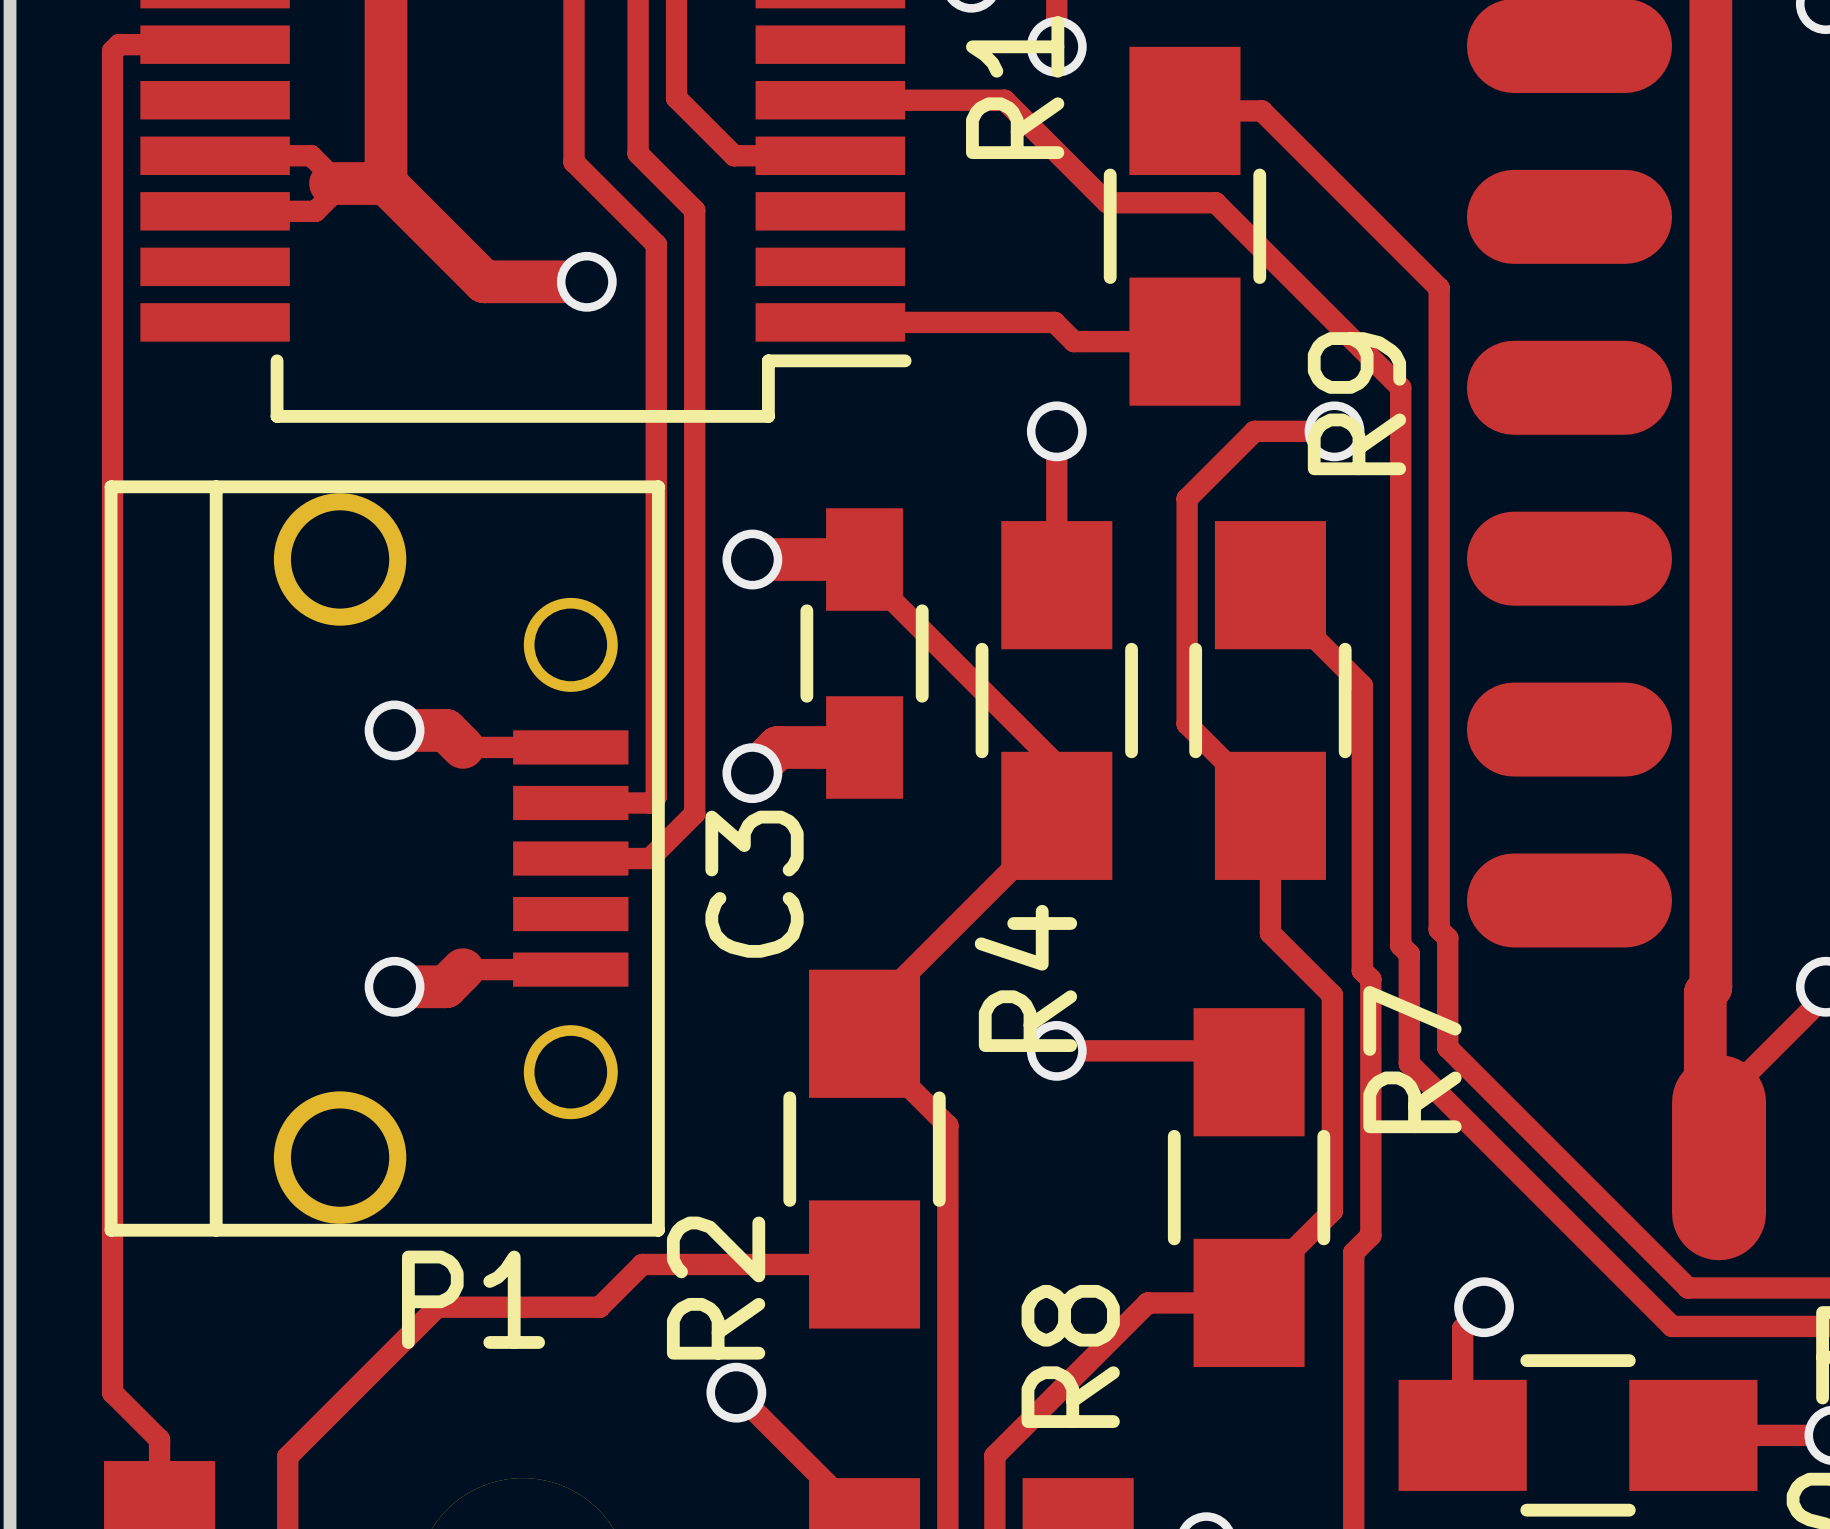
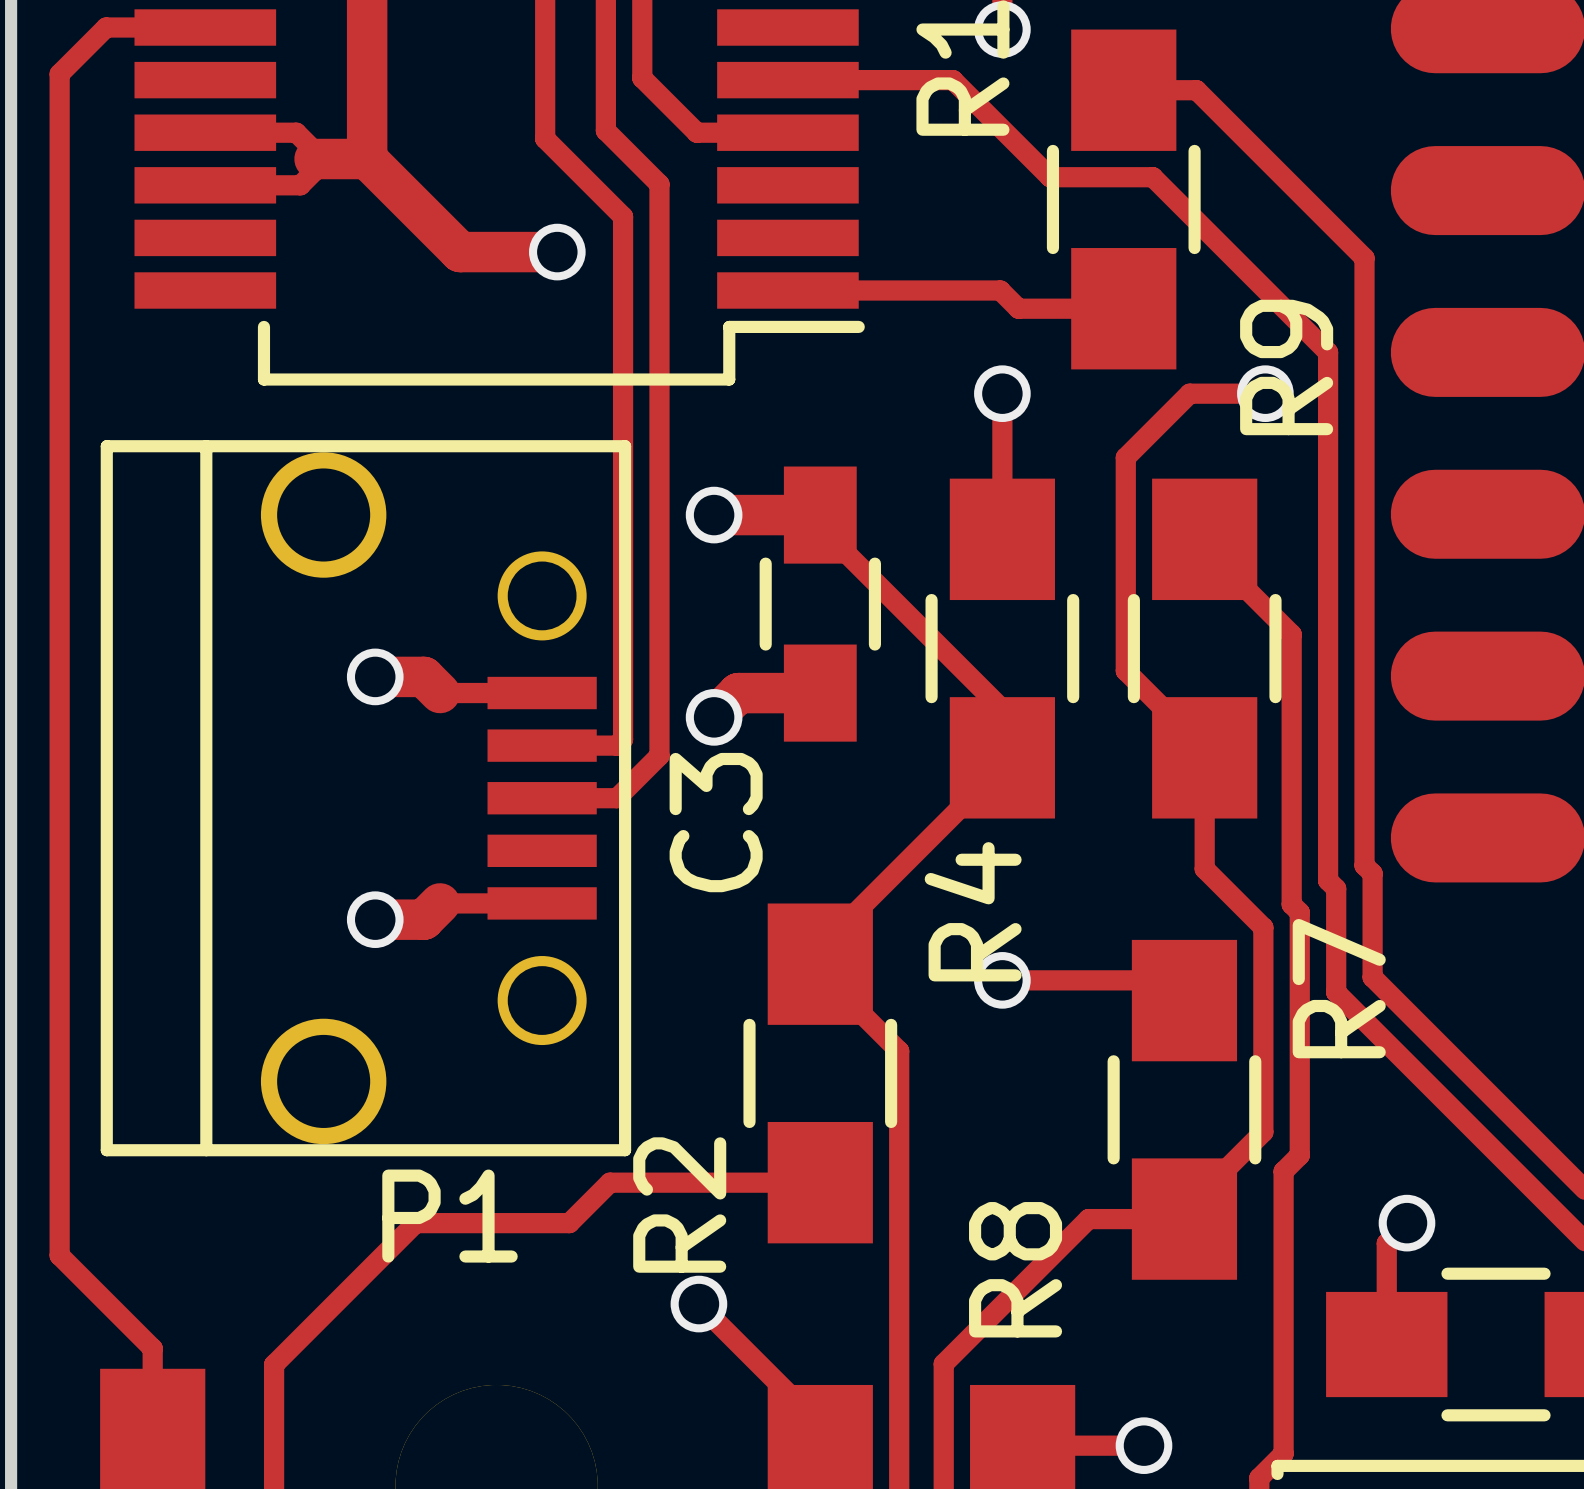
track: (118, 44) (112, 51) (112, 1392) -> (114, 27) (106, 27) (59, 74) (59, 1255) (108, 1304)

